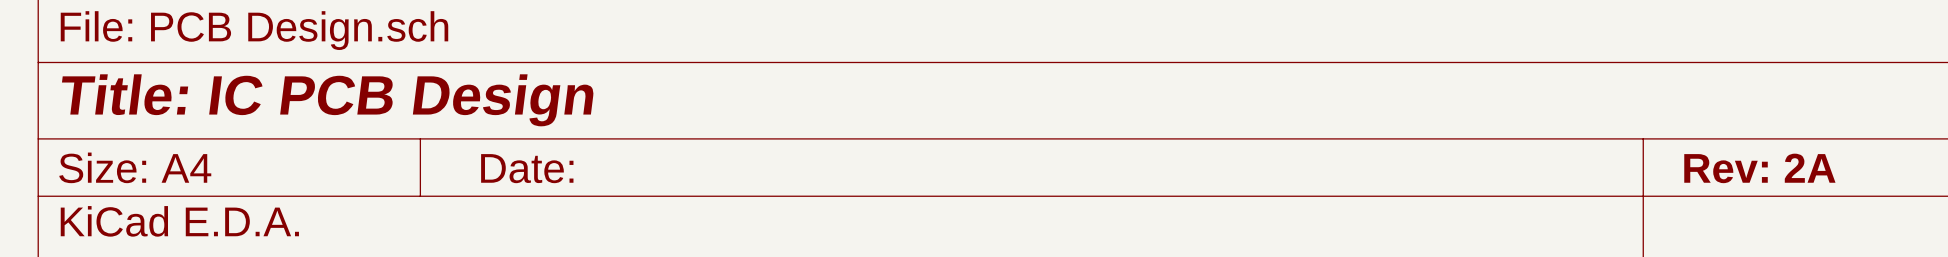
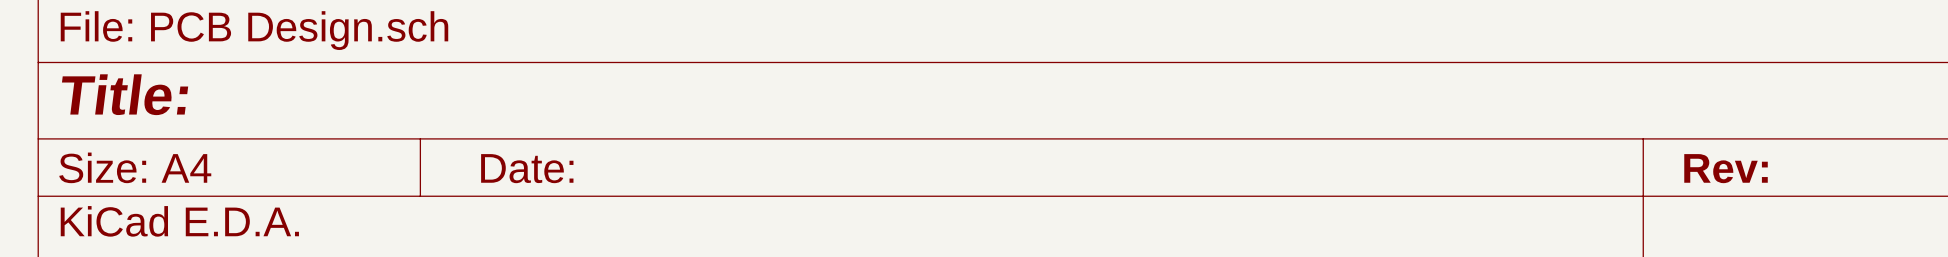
title block: Title: IC PCB Design (327, 100) -> Title: (125, 94)
title block: Rev: 2A (1759, 168) -> Rev: (1726, 168)

